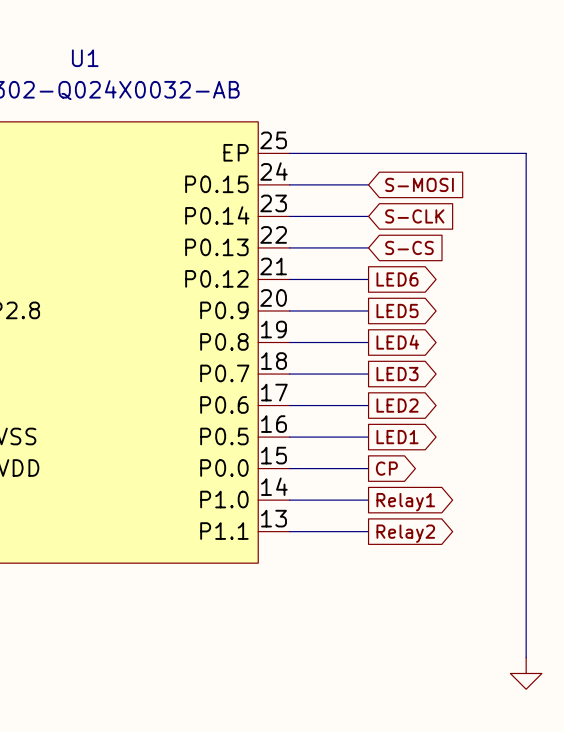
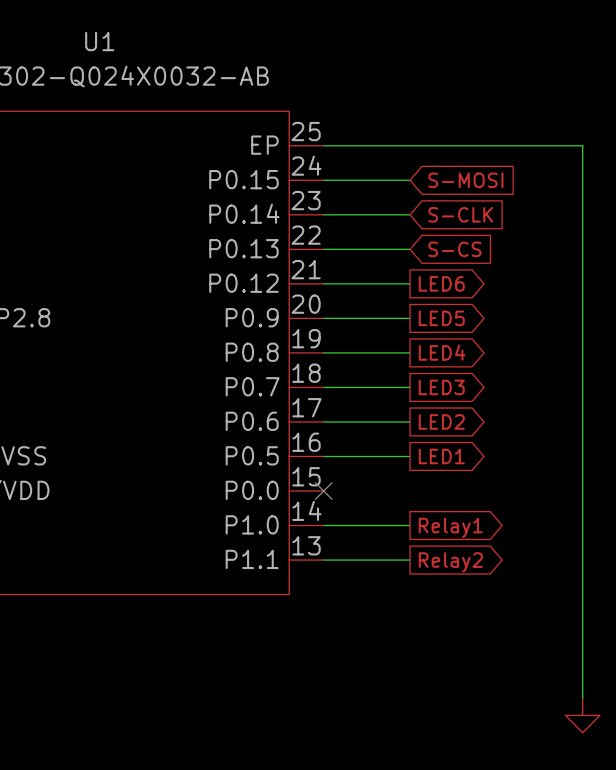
wire: (289, 468) (368, 468) -> none
no-connect mark: none -> (323, 491)
global label: CP (386, 468) -> none

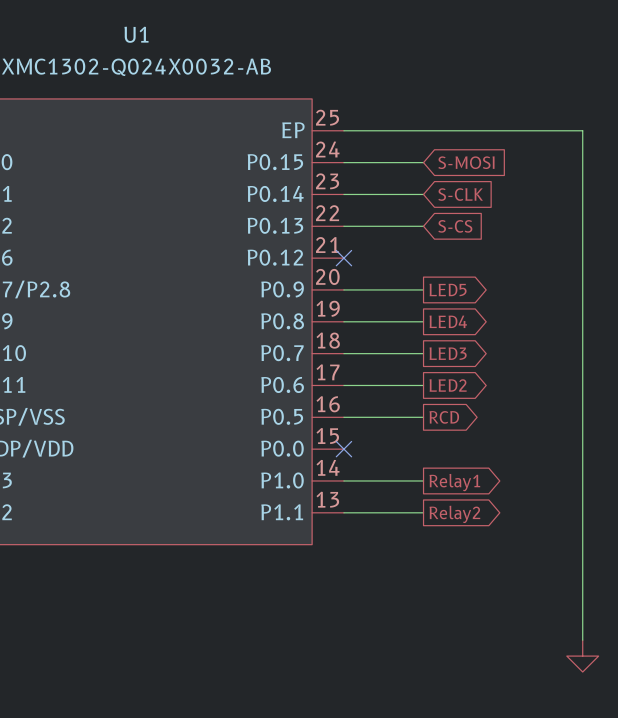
wire: (323, 283) (410, 283) -> none
no-connect mark: none -> (343, 258)
global label: LED6 (441, 283) -> none
global label: LED1 (441, 456) -> RCD (444, 417)

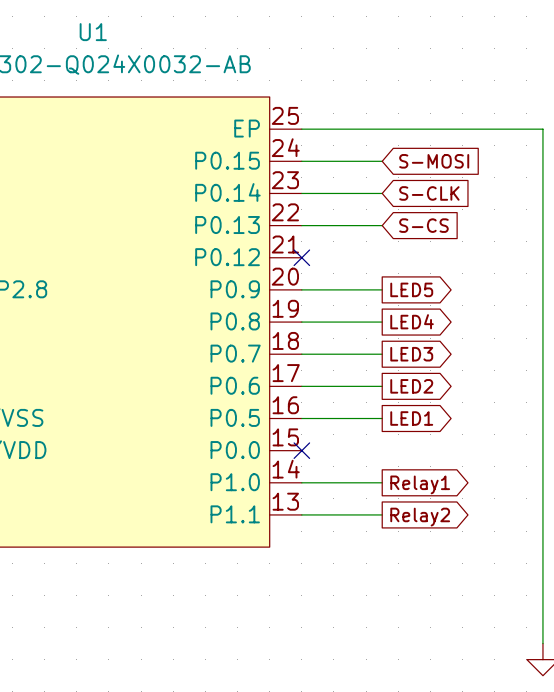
global label: RCD (444, 417) -> LED1 (411, 418)

